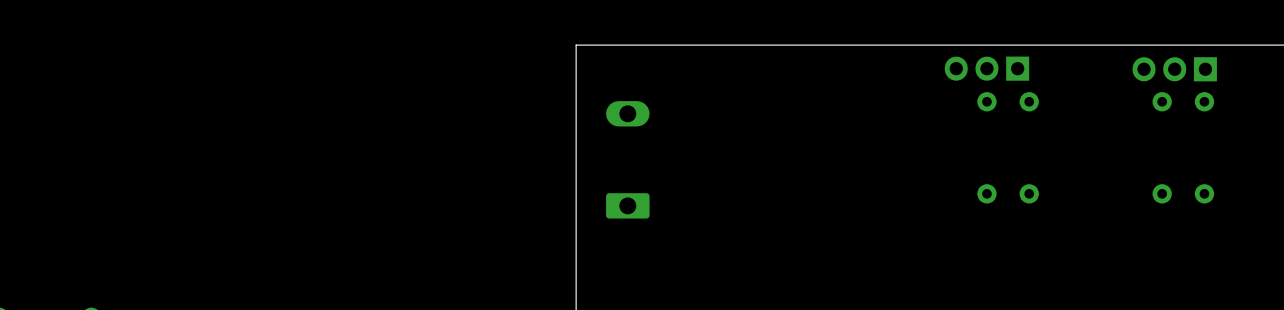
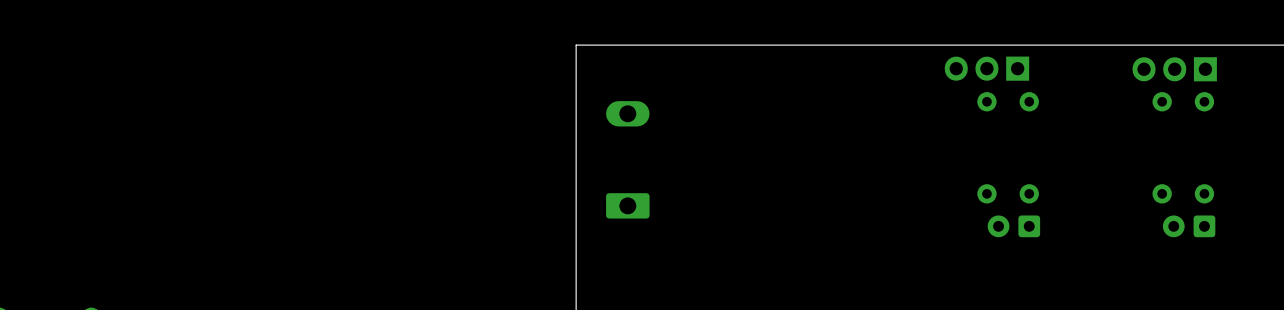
part: none -> (1013, 226)
part: none -> (1189, 226)

